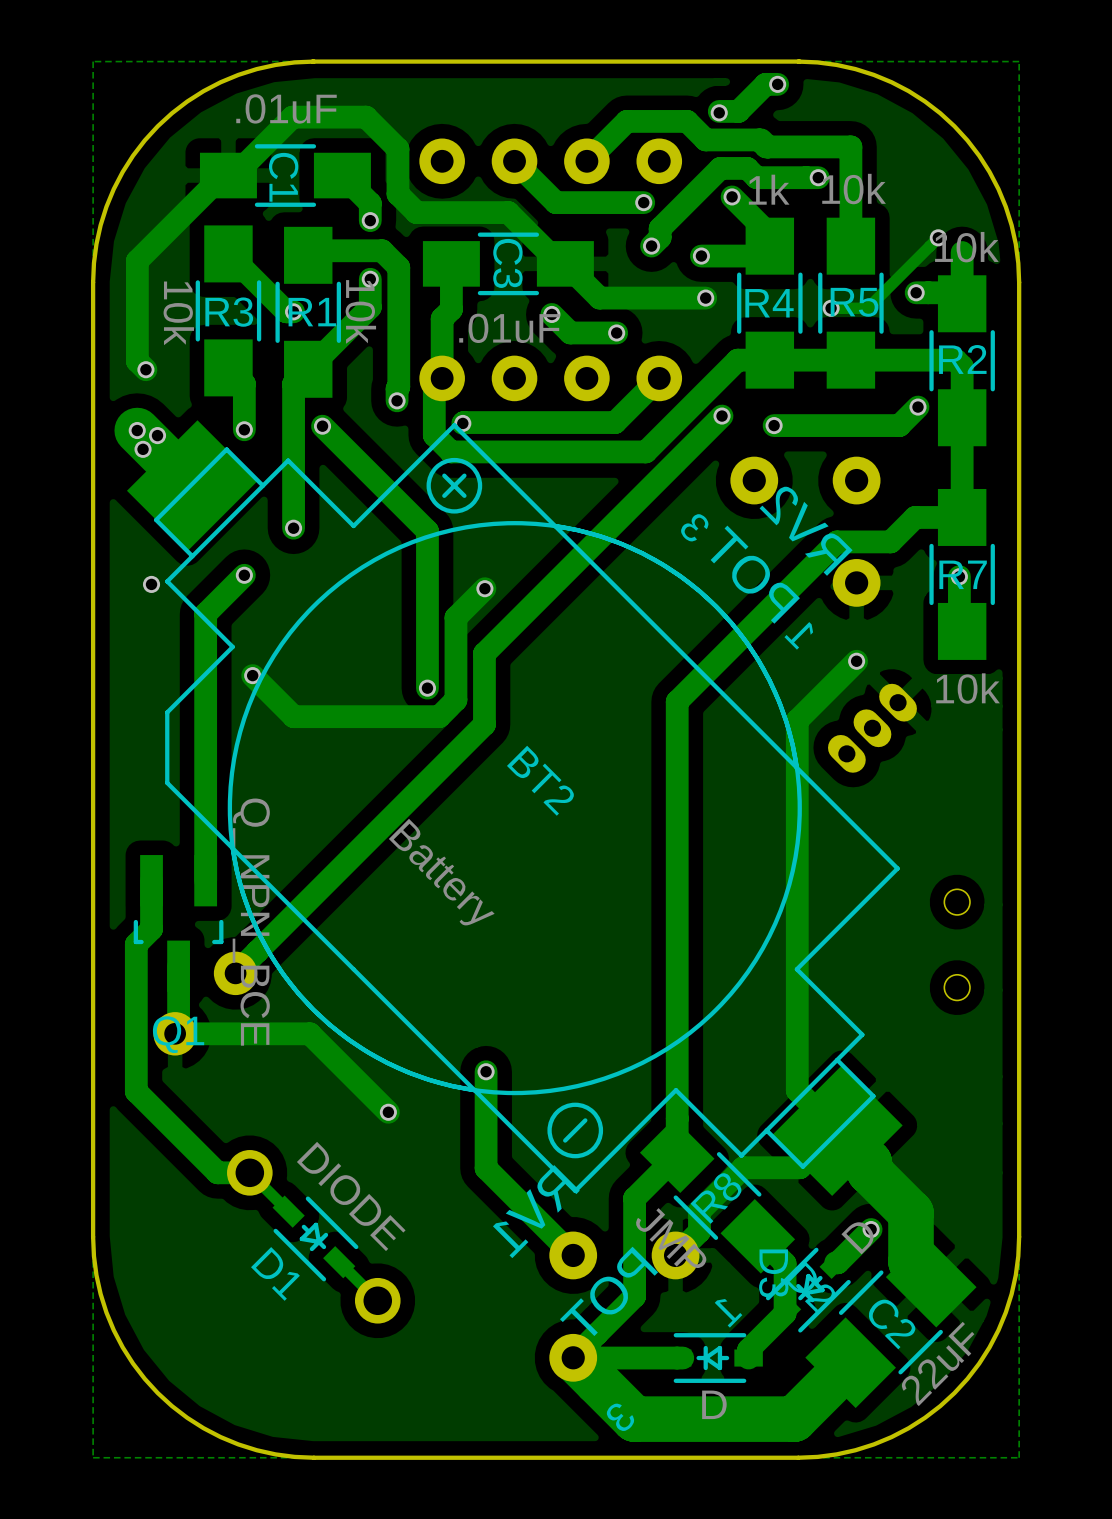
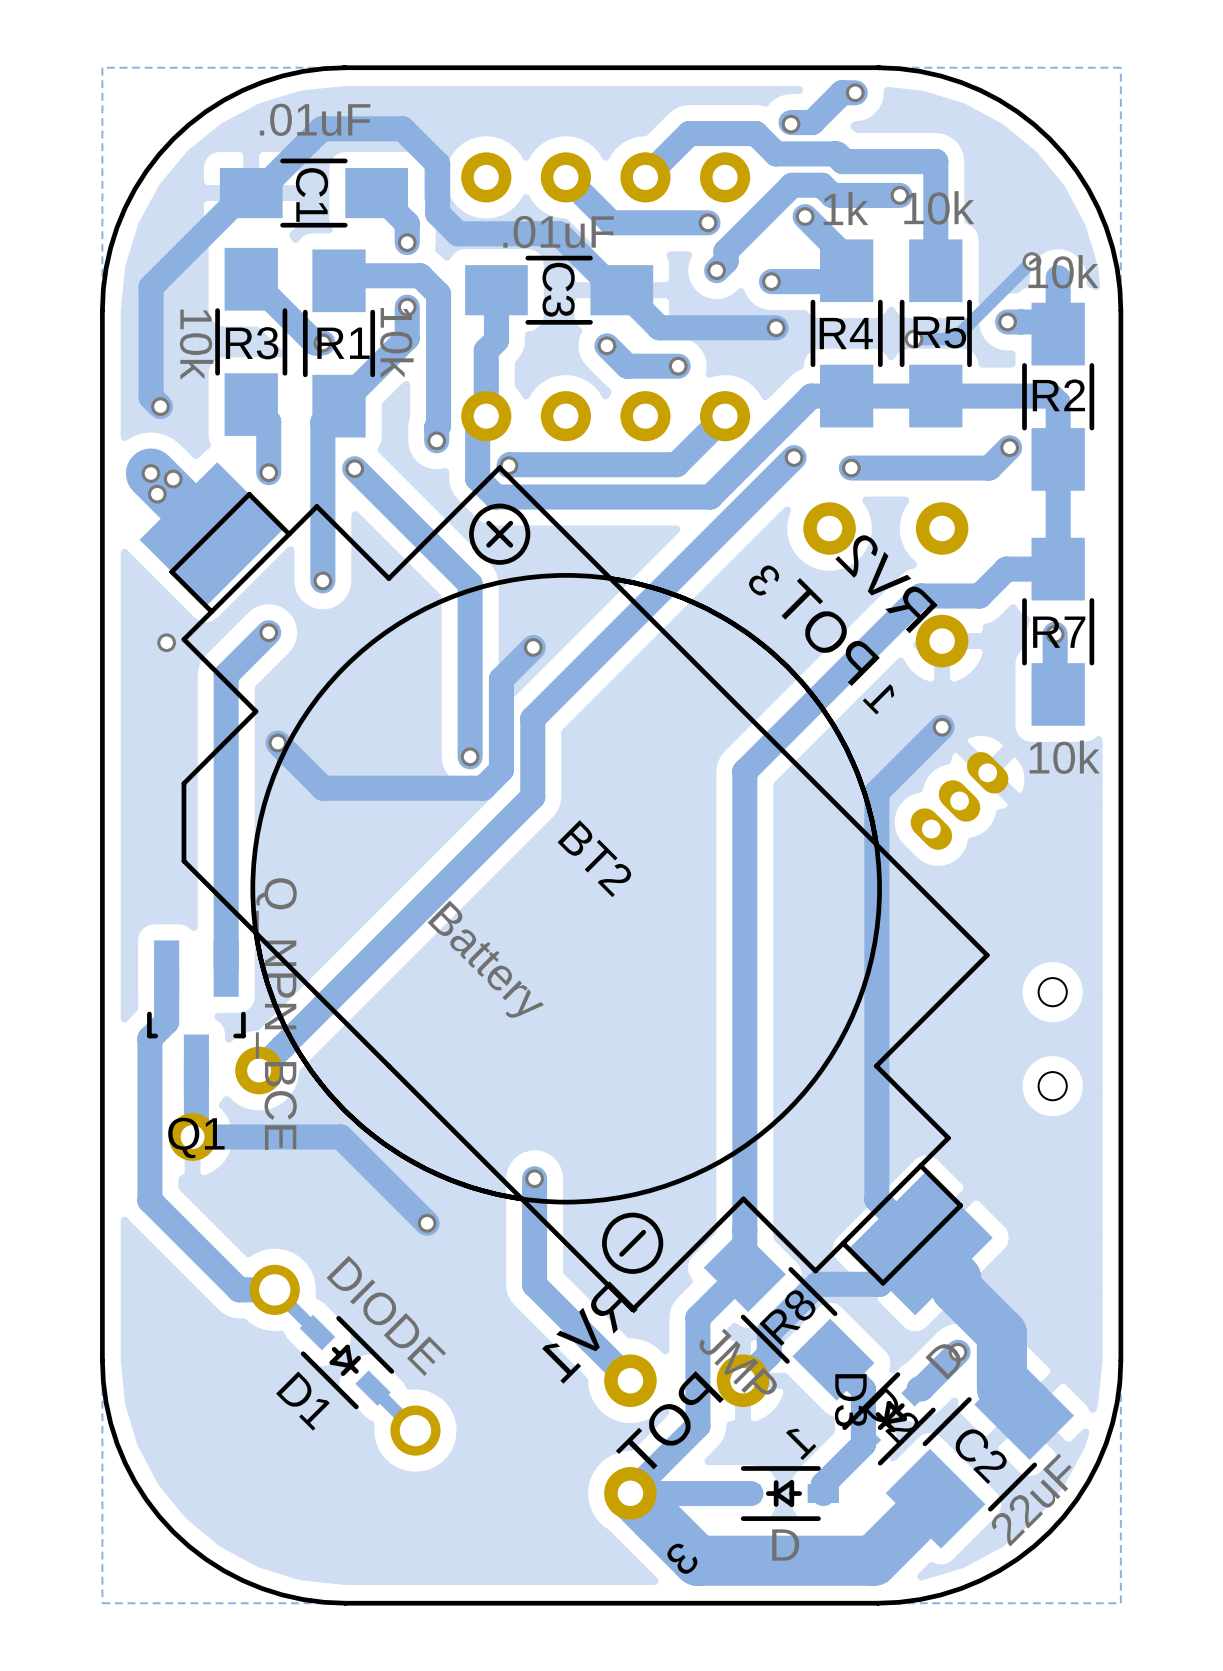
C3 value position: .01uF (509, 328) -> .01uF (558, 232)

